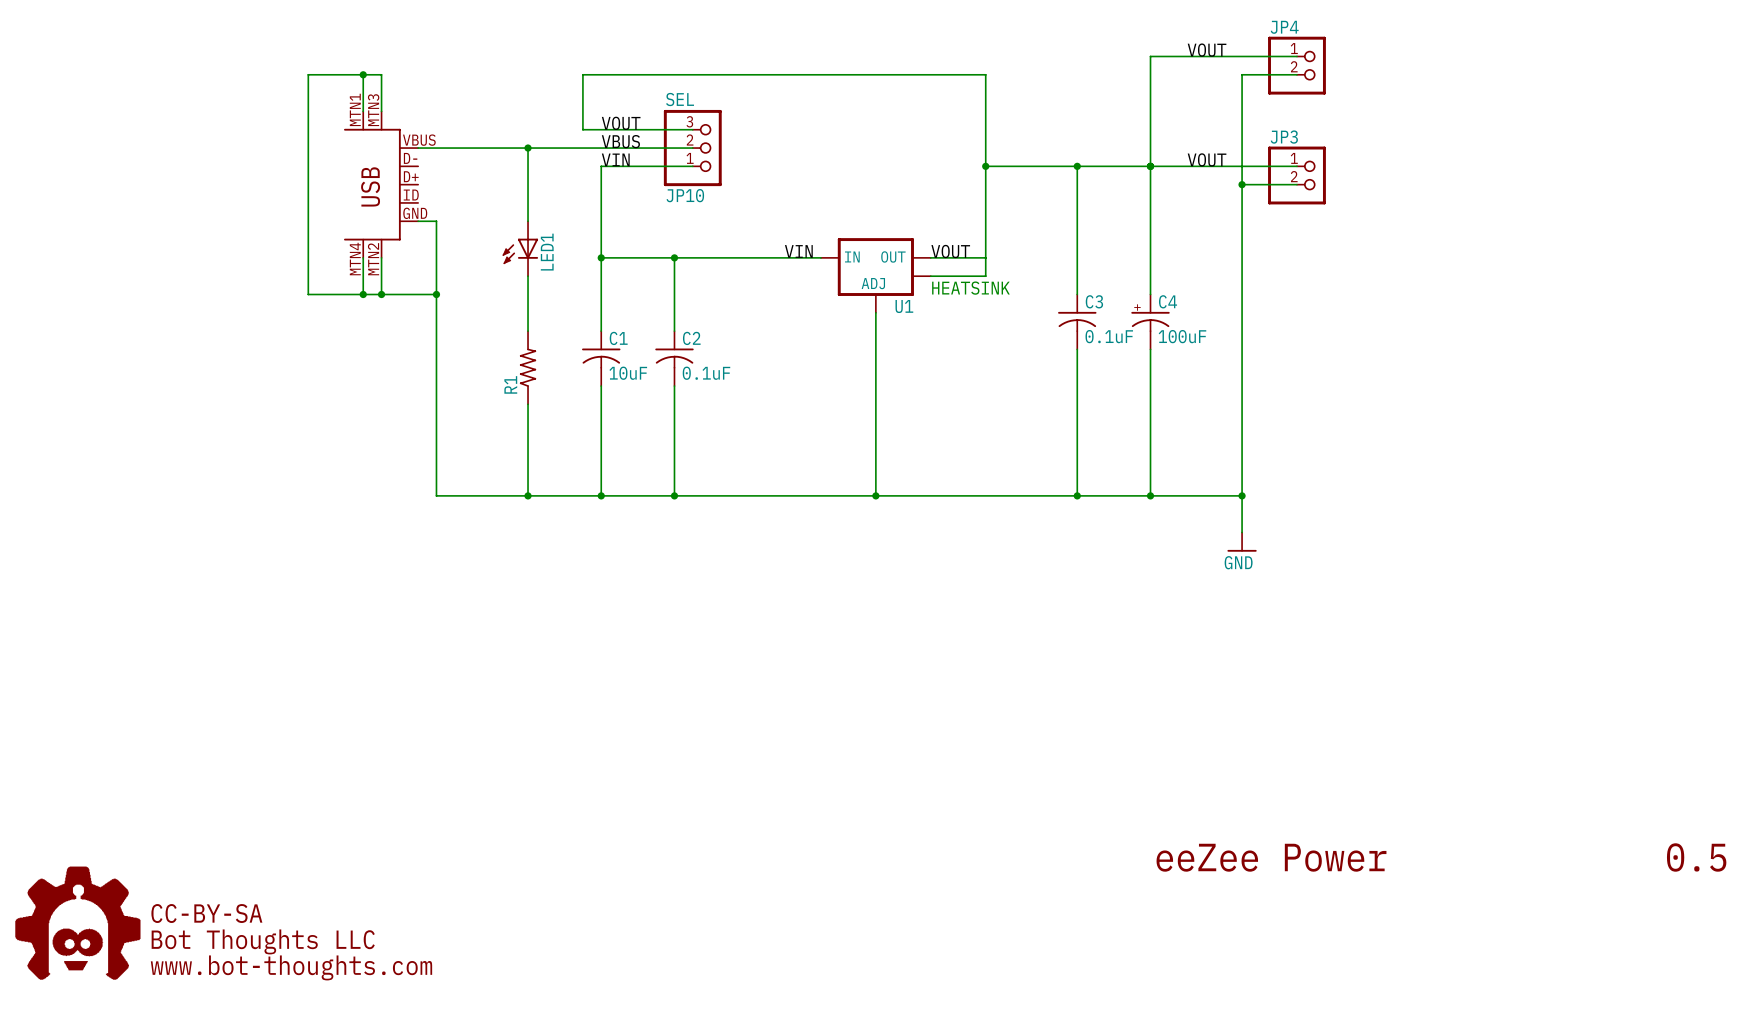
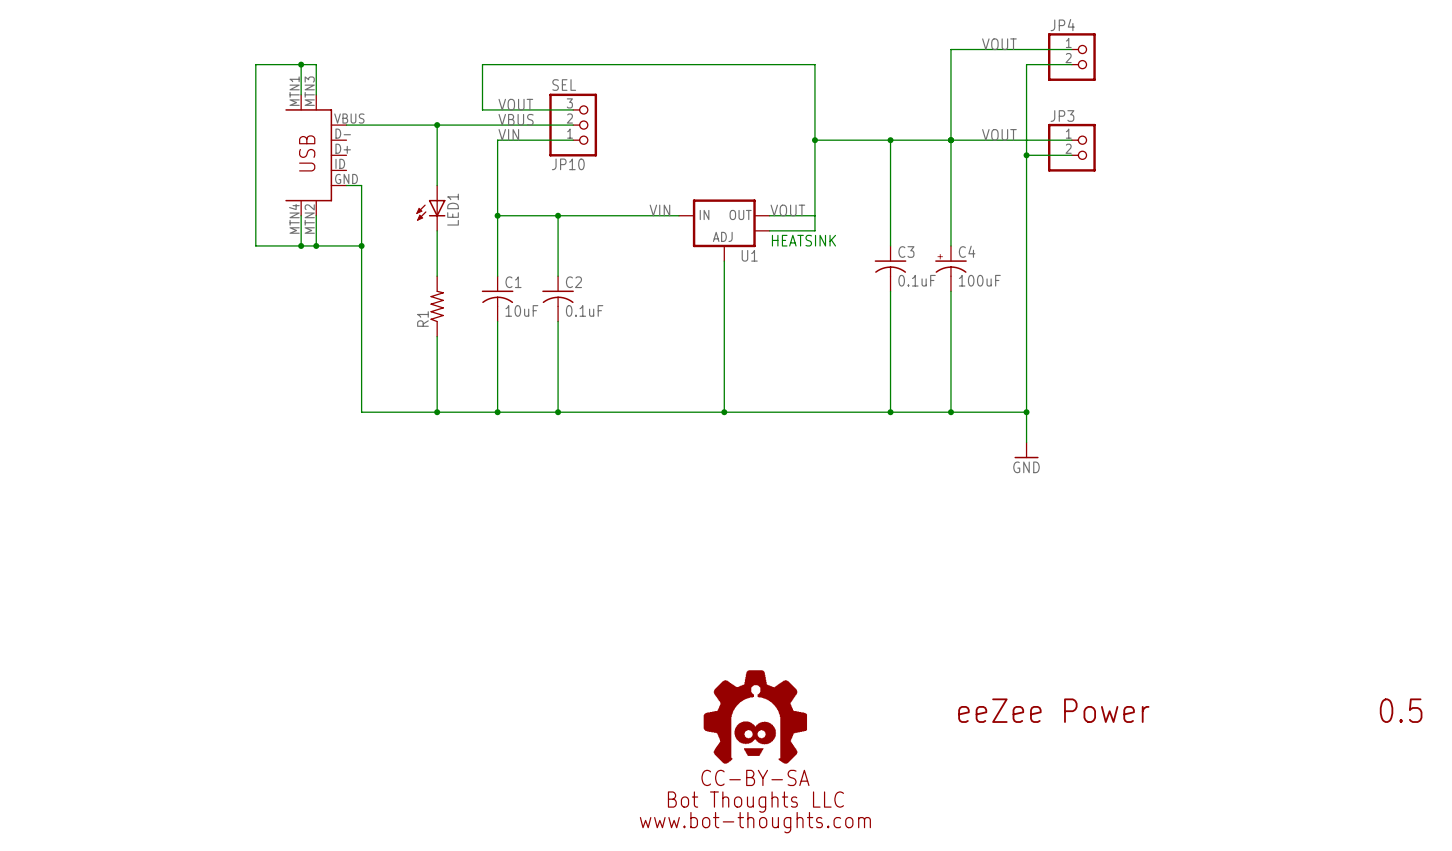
part: none -> (755, 716)
part: (77, 923) -> none

